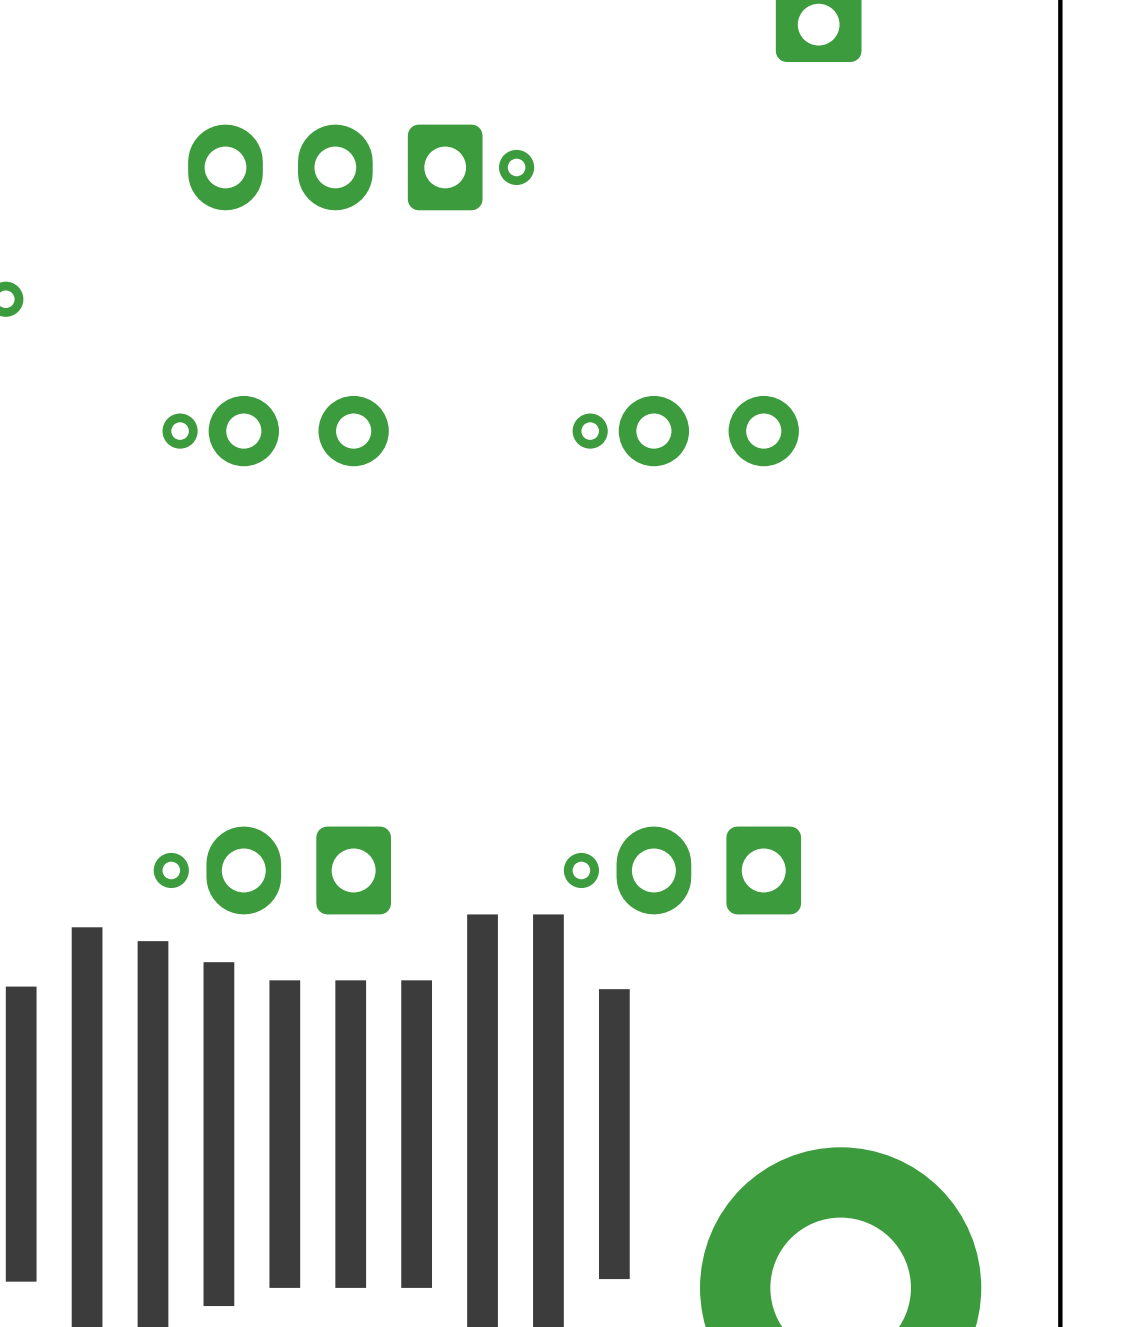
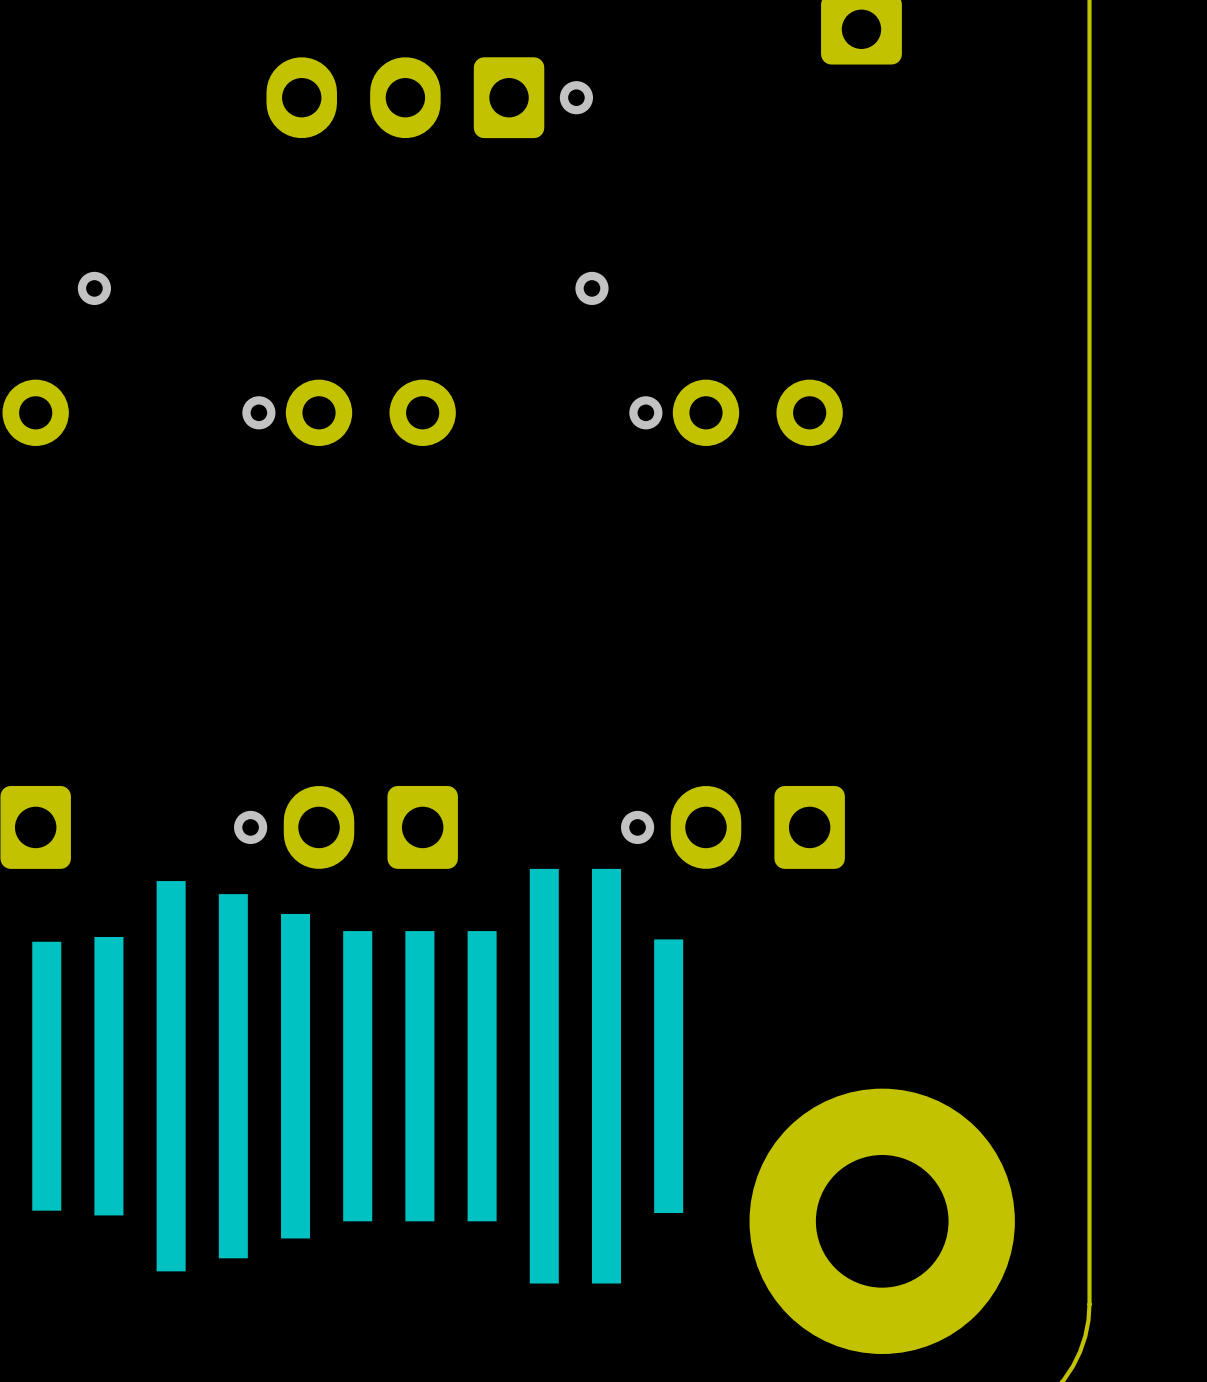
via: none -> (576, 97)
part position: (335, 167) -> (405, 97)
via: (516, 167) -> none
via: none -> (591, 288)

